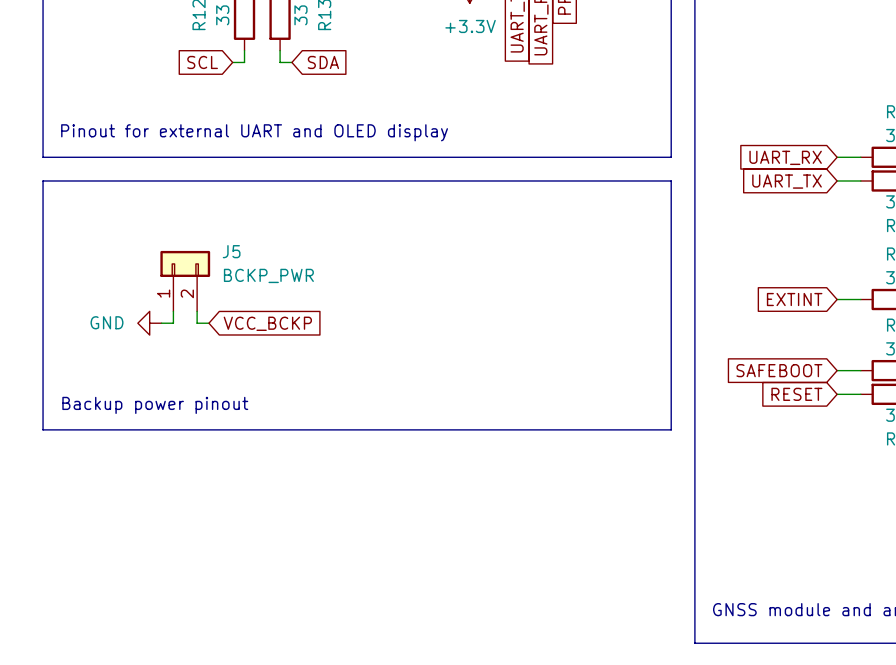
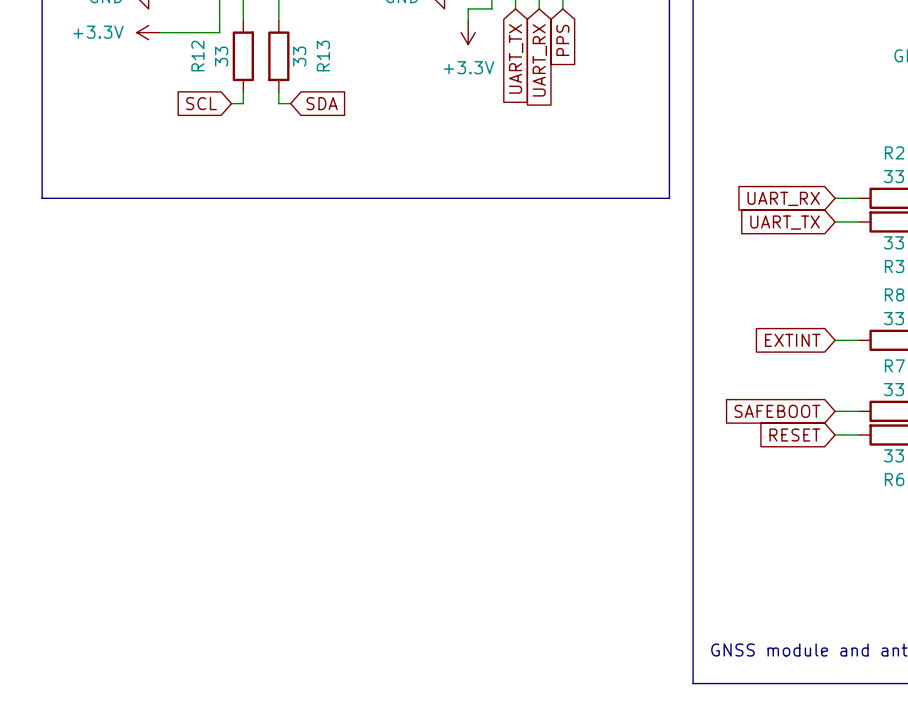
text: Pinout for external UART and OLED display (254, 132) -> none
line: (43, 180) (43, 429) (671, 429) (671, 180) (43, 180) -> none
J5: BCKP_PWR (185, 281) -> none
wire: (173, 311) (173, 323) (161, 323) -> none
wire: (197, 311) (197, 323) (208, 323) -> none
power symbol: GND (149, 323) -> none
global label: VCC_BCKP (267, 323) -> none
text: Backup power pinout (155, 405) -> none

